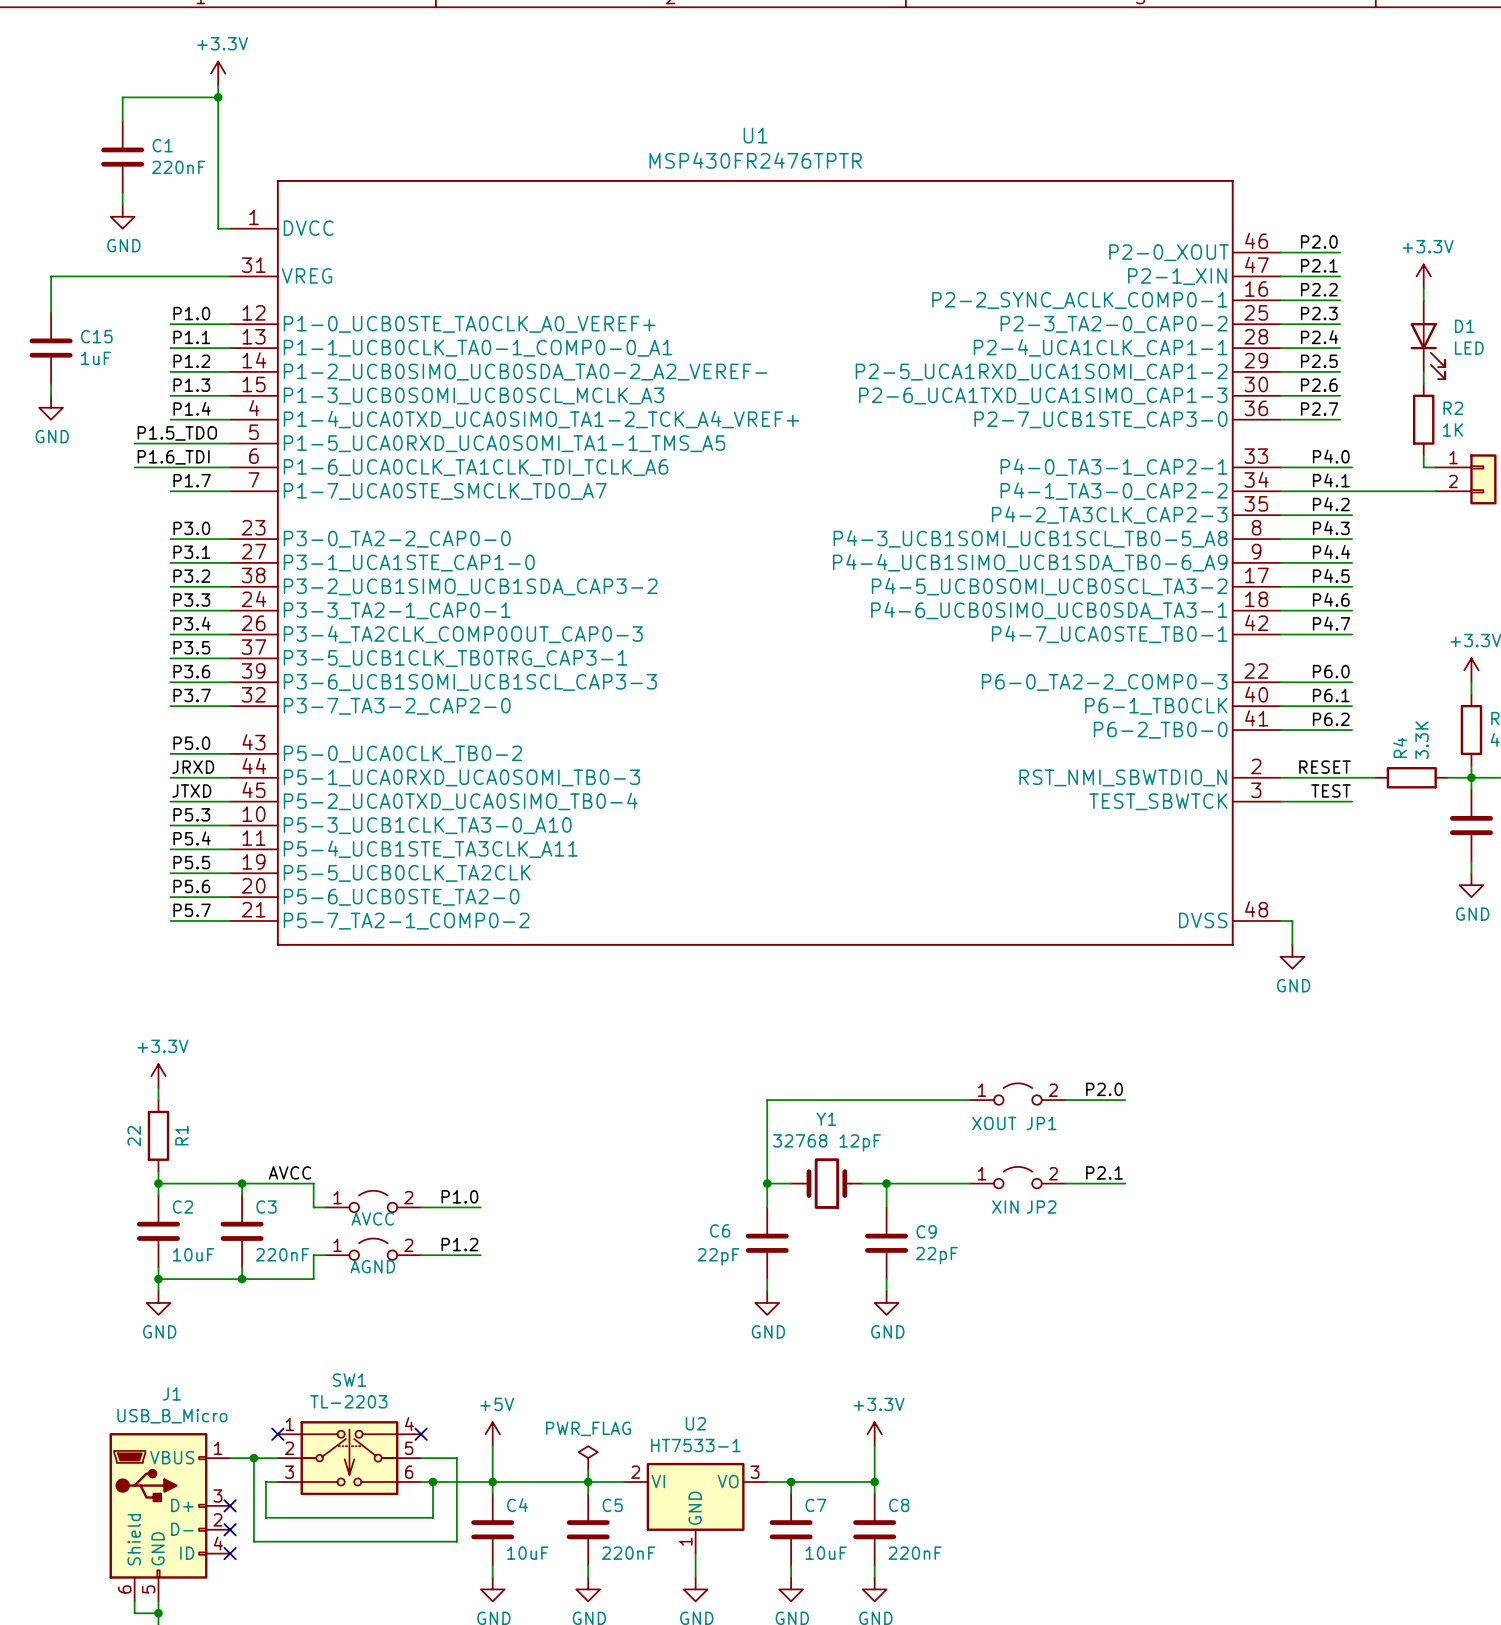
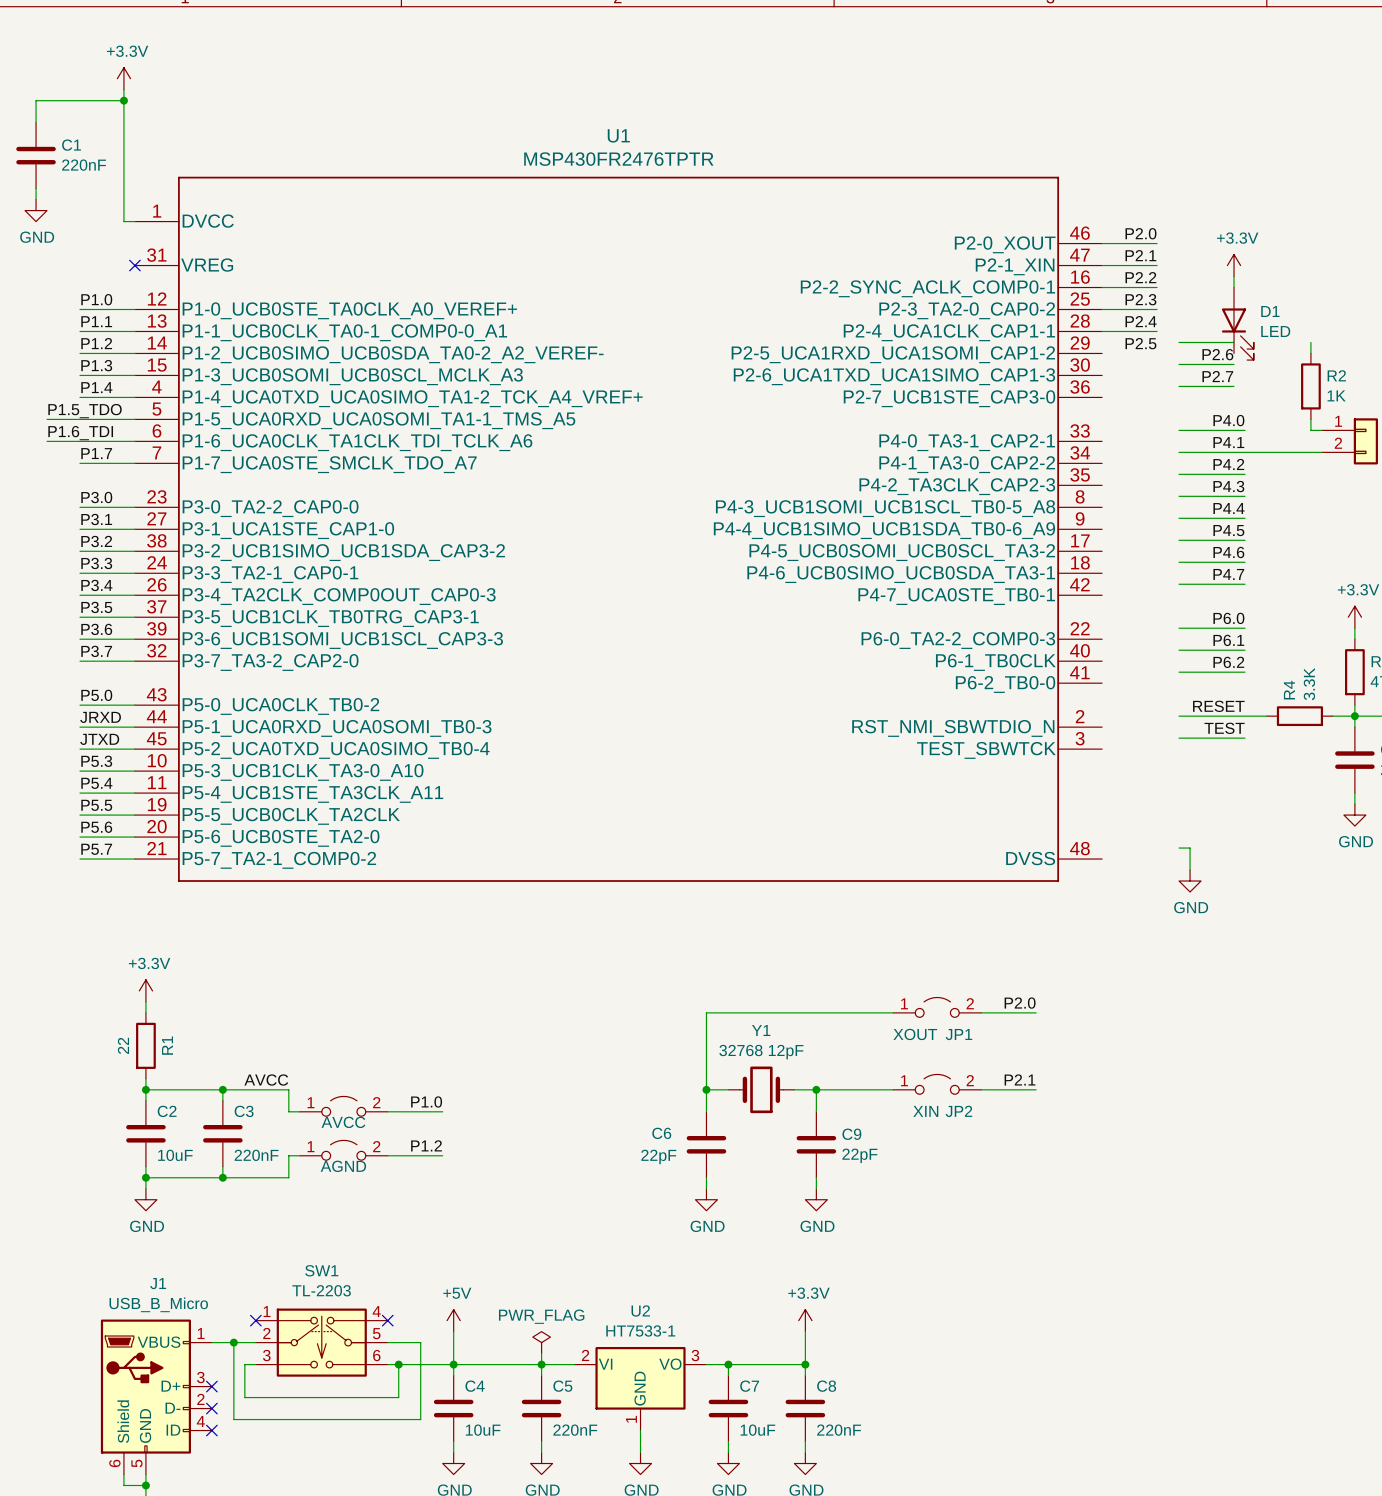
power symbol position: +3.3V (218, 73) -> +3.3V (123, 78)
wire: (218, 85) (218, 228) (230, 228) -> (123, 89) (123, 221) (134, 221)
wire: (218, 97) (122, 97) (122, 121) -> (123, 100) (36, 100) (36, 122)
junction: (218, 97) -> none
junction: none -> (123, 100)
C1 position: (122, 157) -> (36, 155)
wire: (122, 192) (122, 204) -> (36, 188) (36, 199)
power symbol position: GND (122, 216) -> GND (36, 210)
label position: P2.0 (1319, 241) -> P2.0 (1140, 233)
wire: (1280, 252) (1340, 252) -> (1102, 243) (1157, 243)
label position: P2.1 (1319, 265) -> P2.1 (1140, 255)
wire: (230, 276) (51, 276) (51, 312) -> none
wire: (1280, 276) (1340, 276) -> (1102, 265) (1157, 265)
power symbol position: +3.3V (1423, 276) -> +3.3V (1234, 265)
no-connect mark: none -> (134, 265)
wire: (1423, 288) (1423, 300) -> none
label position: P2.2 (1319, 289) -> P2.2 (1140, 277)
wire: (1280, 300) (1340, 300) -> (1234, 287) (1234, 276)
wire: none -> (1102, 287) (1157, 287)
label position: P1.0 (191, 313) -> P1.0 (96, 299)
label position: P2.3 (1319, 313) -> P2.3 (1140, 299)
wire: (170, 324) (230, 324) -> (79, 309) (134, 309)
wire: (1280, 324) (1340, 324) -> (1102, 309) (1157, 309)
label position: P1.1 (191, 337) -> P1.1 (96, 321)
label position: P2.4 (1319, 337) -> P2.4 (1141, 321)
D1 position: (1427, 339) -> (1237, 323)
C15: 1uF (51, 348) -> none
wire: (170, 348) (230, 348) -> (79, 331) (134, 331)
wire: (1280, 348) (1340, 348) -> (1102, 331) (1157, 331)
label position: P1.2 (191, 361) -> P1.2 (96, 343)
label position: P2.5 (1319, 361) -> P2.5 (1140, 343)
wire: (170, 371) (230, 371) -> (79, 353) (134, 353)
wire: (51, 383) (51, 395) -> none
label position: P1.3 (191, 385) -> P1.3 (96, 365)
wire: (170, 395) (230, 395) -> (79, 375) (134, 375)
power symbol: GND (51, 407) -> none
label position: P1.4 (192, 408) -> P1.4 (96, 387)
wire: (170, 419) (230, 419) -> (79, 397) (134, 397)
label position: P1.5_TDO (177, 433) -> P1.5_TDO (85, 411)
wire: (134, 443) (230, 443) -> (47, 419) (134, 419)
label position: P1.6_TDI (173, 457) -> P1.6_TDI (80, 433)
wire: (134, 467) (230, 467) -> (47, 441) (134, 441)
label position: P1.7 (192, 480) -> P1.7 (96, 453)
wire: (170, 491) (230, 491) -> (79, 463) (134, 463)
label position: P3.0 (191, 528) -> P3.0 (96, 497)
wire: (170, 539) (230, 539) -> (79, 507) (134, 507)
label position: P3.1 (191, 552) -> P3.1 (96, 519)
wire: (170, 562) (230, 562) -> (79, 529) (134, 529)
U1 position: (755, 562) -> (618, 529)
label position: P3.2 (191, 576) -> P3.2 (96, 541)
wire: (170, 586) (230, 586) -> (79, 551) (134, 551)
label position: P3.3 (191, 600) -> P3.3 (96, 563)
wire: (170, 610) (230, 610) -> (79, 573) (134, 573)
label position: P3.4 (192, 623) -> P3.4 (96, 585)
wire: (170, 634) (230, 634) -> (79, 595) (134, 595)
label position: P3.5 (191, 647) -> P3.5 (96, 607)
wire: (170, 658) (230, 658) -> (79, 617) (134, 617)
label position: P3.6 (191, 671) -> P3.6 (96, 629)
wire: (170, 682) (230, 682) -> (79, 639) (134, 639)
label position: P3.7 (192, 695) -> P3.7 (96, 651)
wire: (170, 706) (230, 706) -> (79, 661) (134, 661)
label position: P5.0 (191, 743) -> P5.0 (96, 695)
wire: (170, 753) (230, 753) -> (79, 705) (134, 705)
label position: JRXD (193, 767) -> JRXD (100, 717)
wire: (170, 777) (230, 777) -> (79, 727) (134, 727)
label position: JTXD (191, 790) -> JTXD (99, 739)
wire: (170, 801) (230, 801) -> (79, 749) (134, 749)
label position: P5.3 (191, 814) -> P5.3 (96, 761)
wire: (170, 825) (230, 825) -> (79, 771) (134, 771)
label position: P5.4 (192, 838) -> P5.4 (96, 783)
wire: (170, 849) (230, 849) -> (79, 793) (134, 793)
label position: P5.5 (191, 862) -> P5.5 (96, 805)
wire: (170, 873) (230, 873) -> (79, 815) (134, 815)
label position: P5.6 (191, 886) -> P5.6 (96, 827)
wire: (170, 897) (230, 897) -> (79, 837) (134, 837)
label position: P5.7 (192, 910) -> P5.7 (96, 849)
wire: (170, 920) (230, 920) -> (79, 859) (134, 859)

